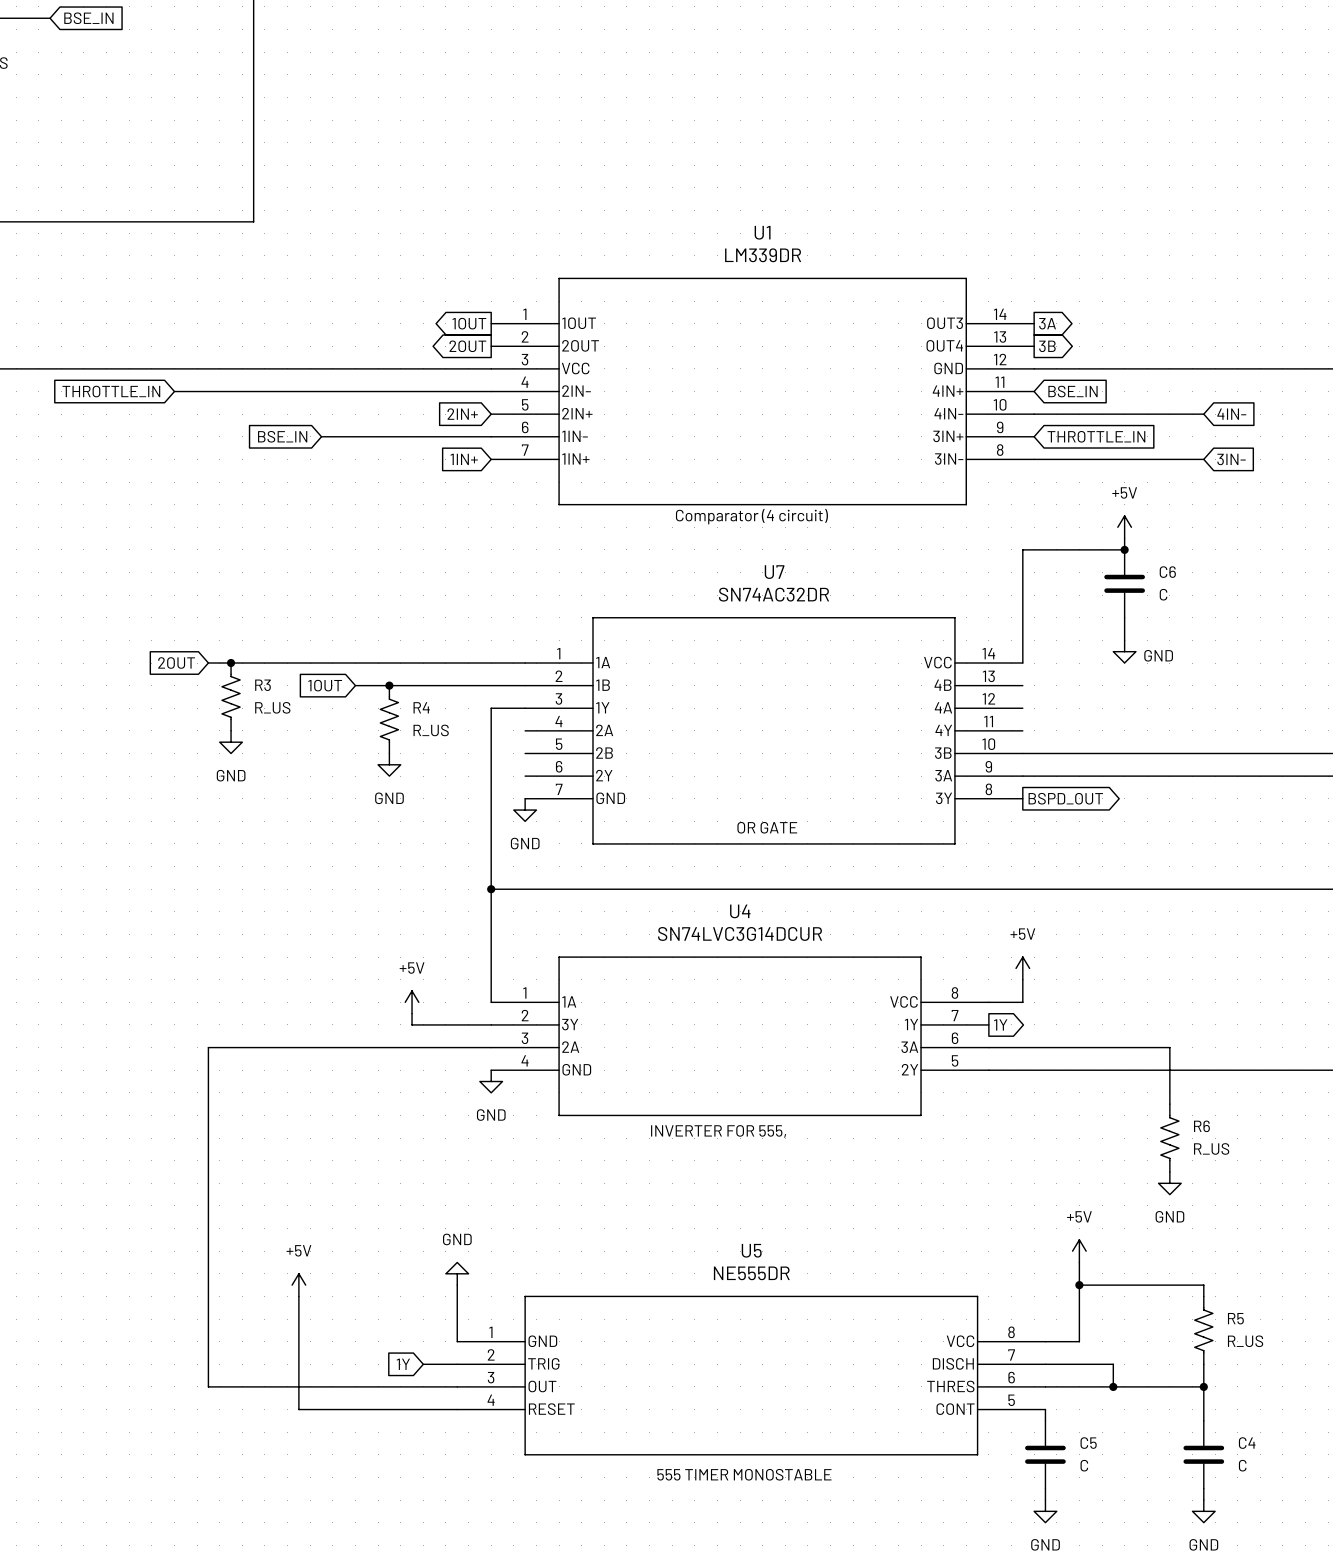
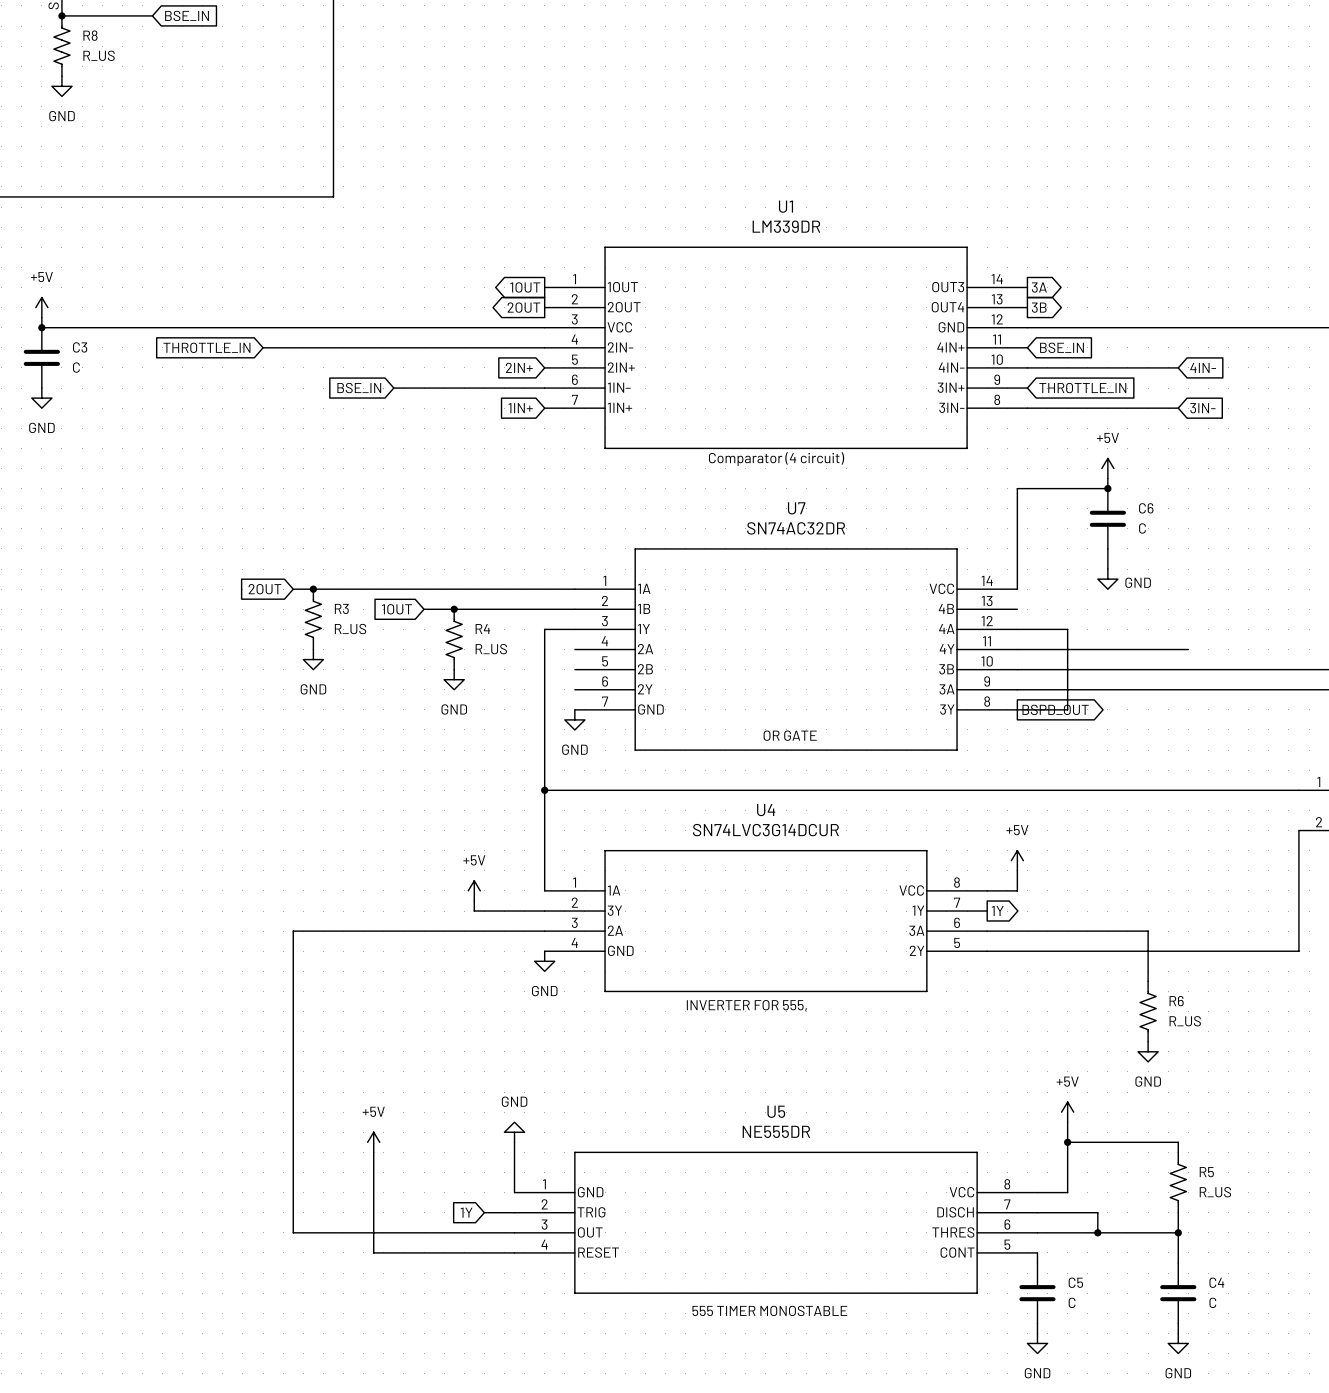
wire: none -> (1017, 629) (1067, 629) (1067, 709) (1017, 709)
wire: none -> (1017, 649) (1188, 649)

